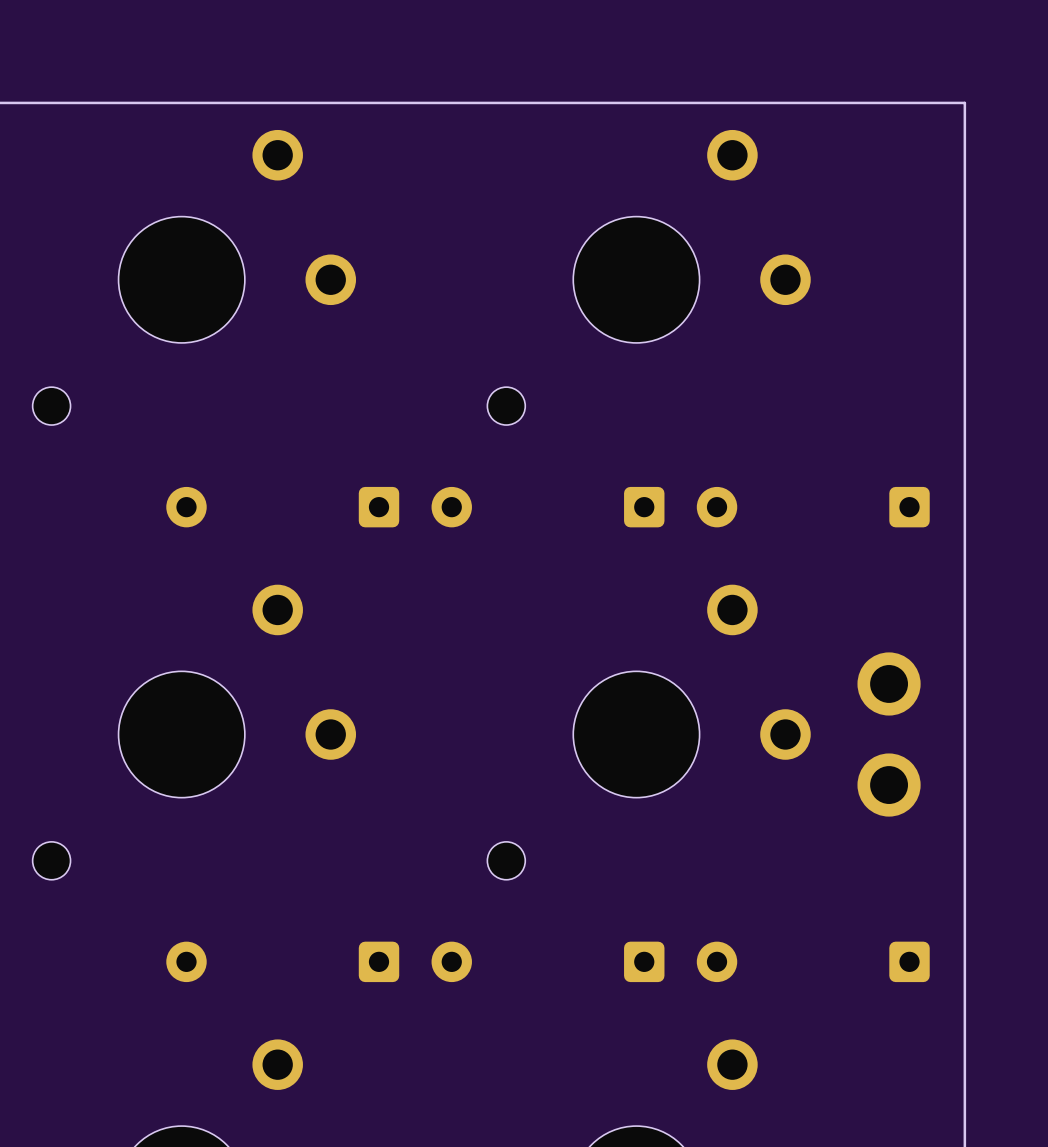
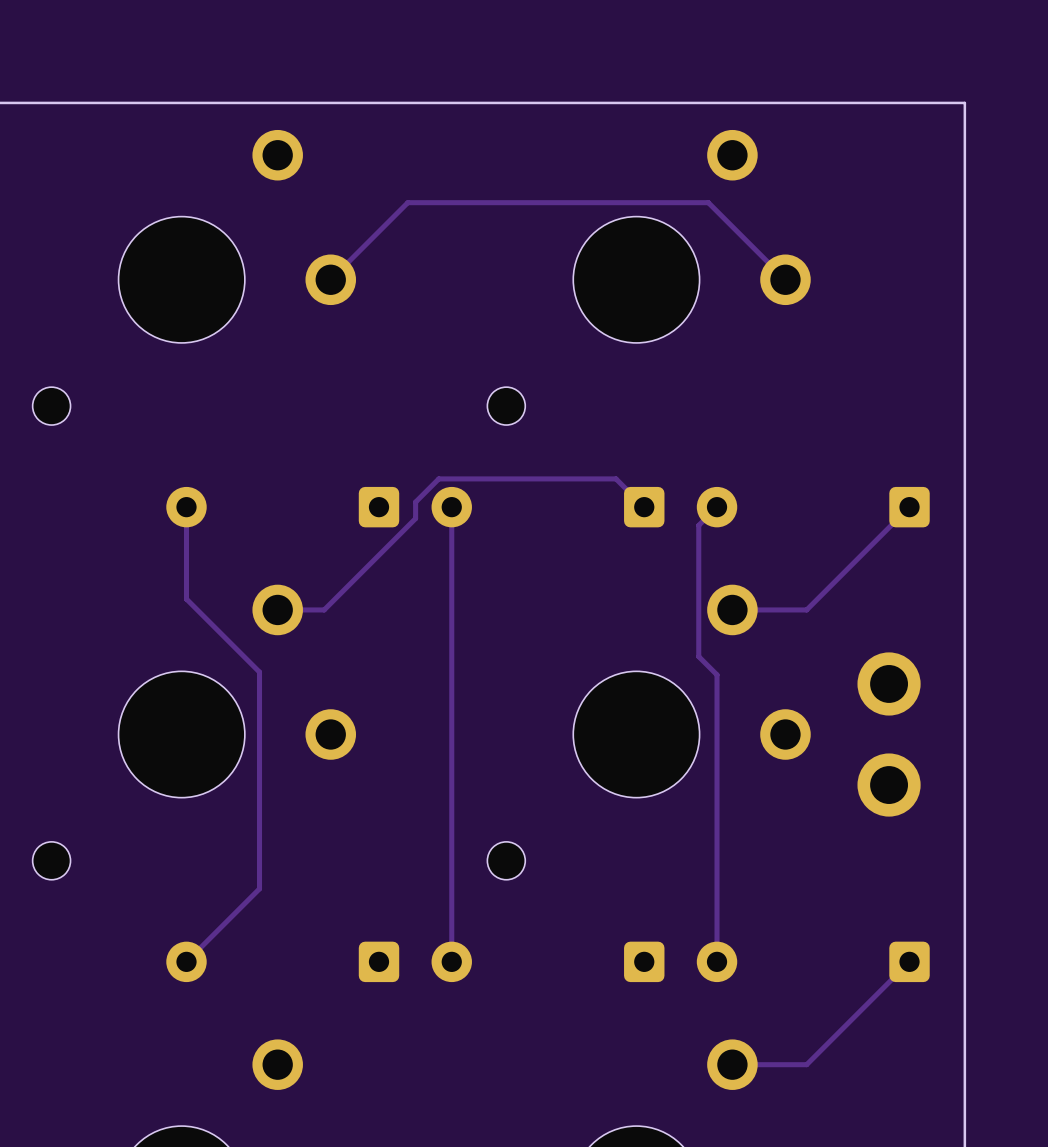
track: none -> (785, 279) (708, 202) (407, 202) (330, 279)
track: none -> (186, 507) (186, 599) (259, 672) (259, 888) (186, 961)
track: none -> (451, 507) (451, 961)
track: none -> (644, 507) (616, 478) (438, 478) (415, 502) (415, 518) (324, 609) (277, 609)
track: none -> (717, 507) (698, 525) (698, 656) (717, 674) (717, 961)
track: none -> (909, 507) (806, 609) (732, 609)
track: none -> (909, 961) (806, 1064) (732, 1064)

